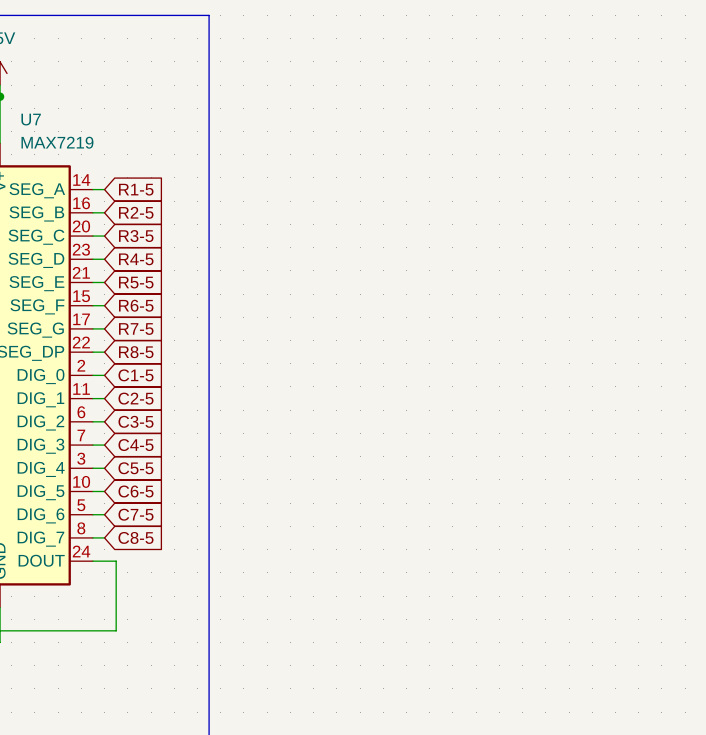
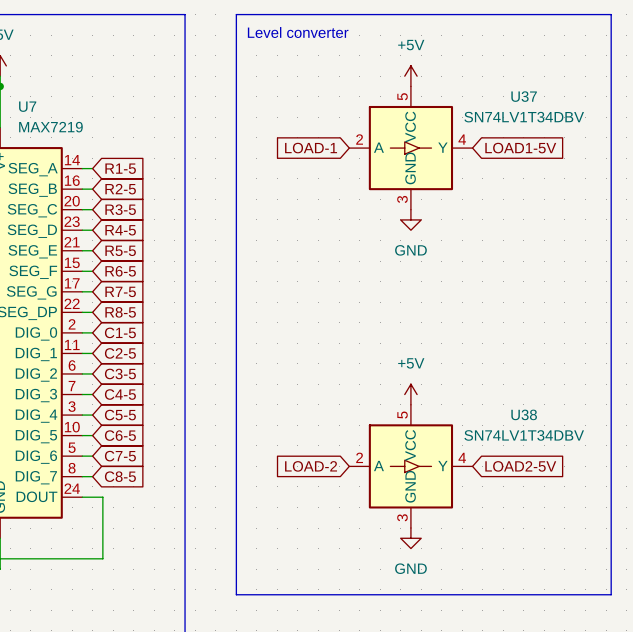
line: none -> (236, 14) (611, 14) (611, 594) (236, 594) (236, 14)
text: none -> Level converter (298, 32)
power symbol: none -> +5V (410, 76)
global label: none -> LOAD-1 (311, 148)
U37: none -> SN74LV1T34DBV (410, 148)
global label: none -> LOAD1-5V (520, 148)
power symbol: none -> GND (410, 219)
power symbol: none -> +5V (410, 394)
global label: none -> LOAD-2 (311, 466)
U38: none -> SN74LV1T34DBV (410, 466)
global label: none -> LOAD2-5V (520, 466)
power symbol: none -> GND (410, 538)

